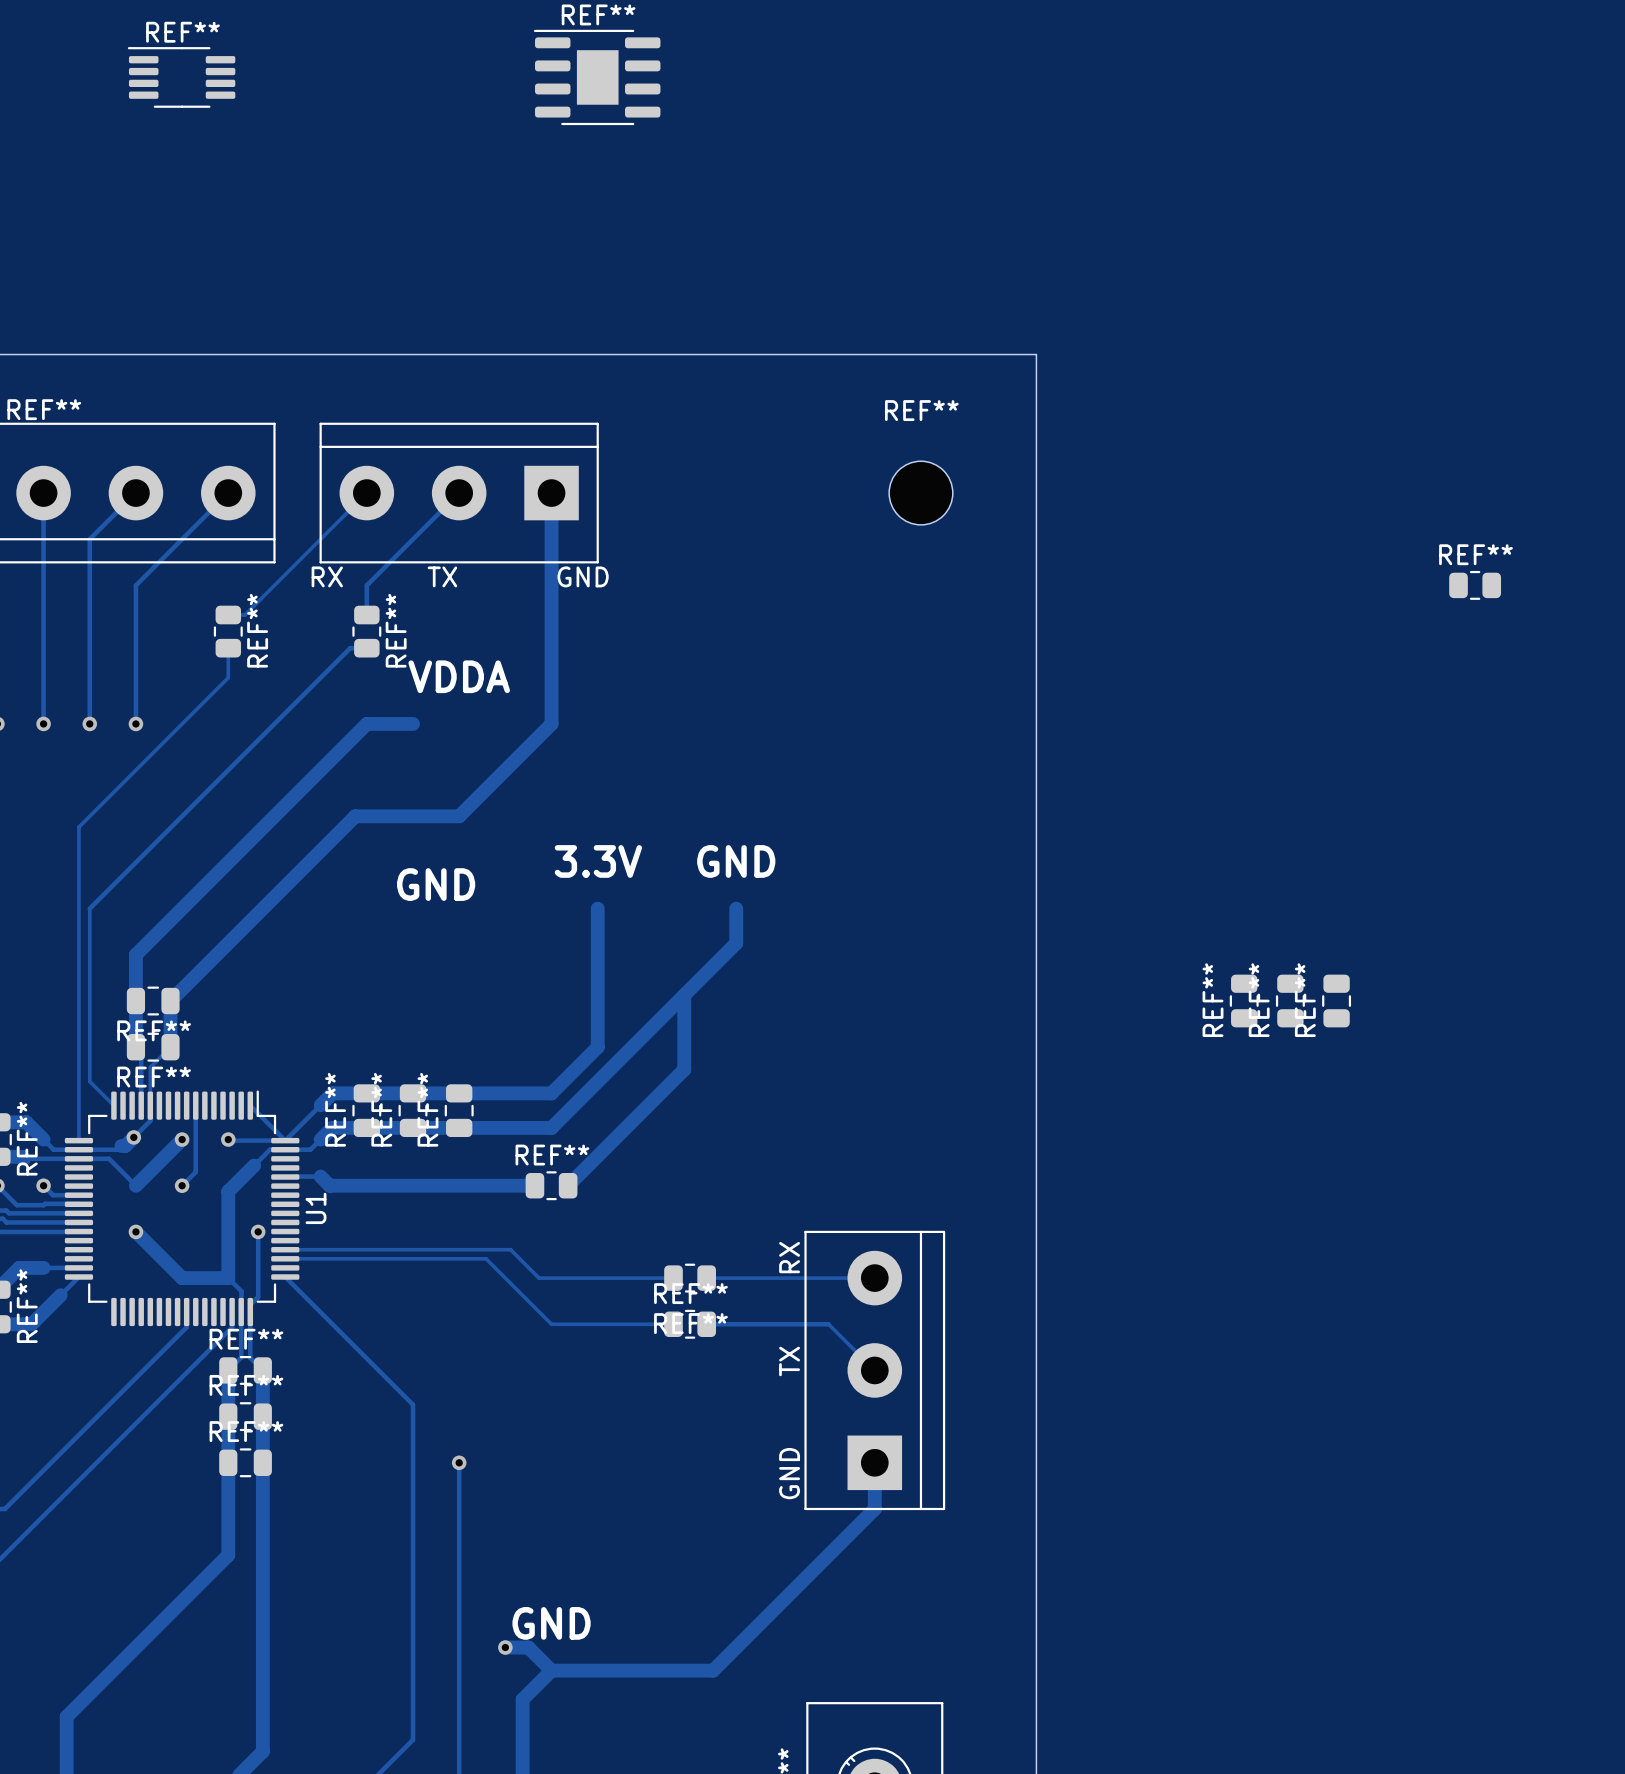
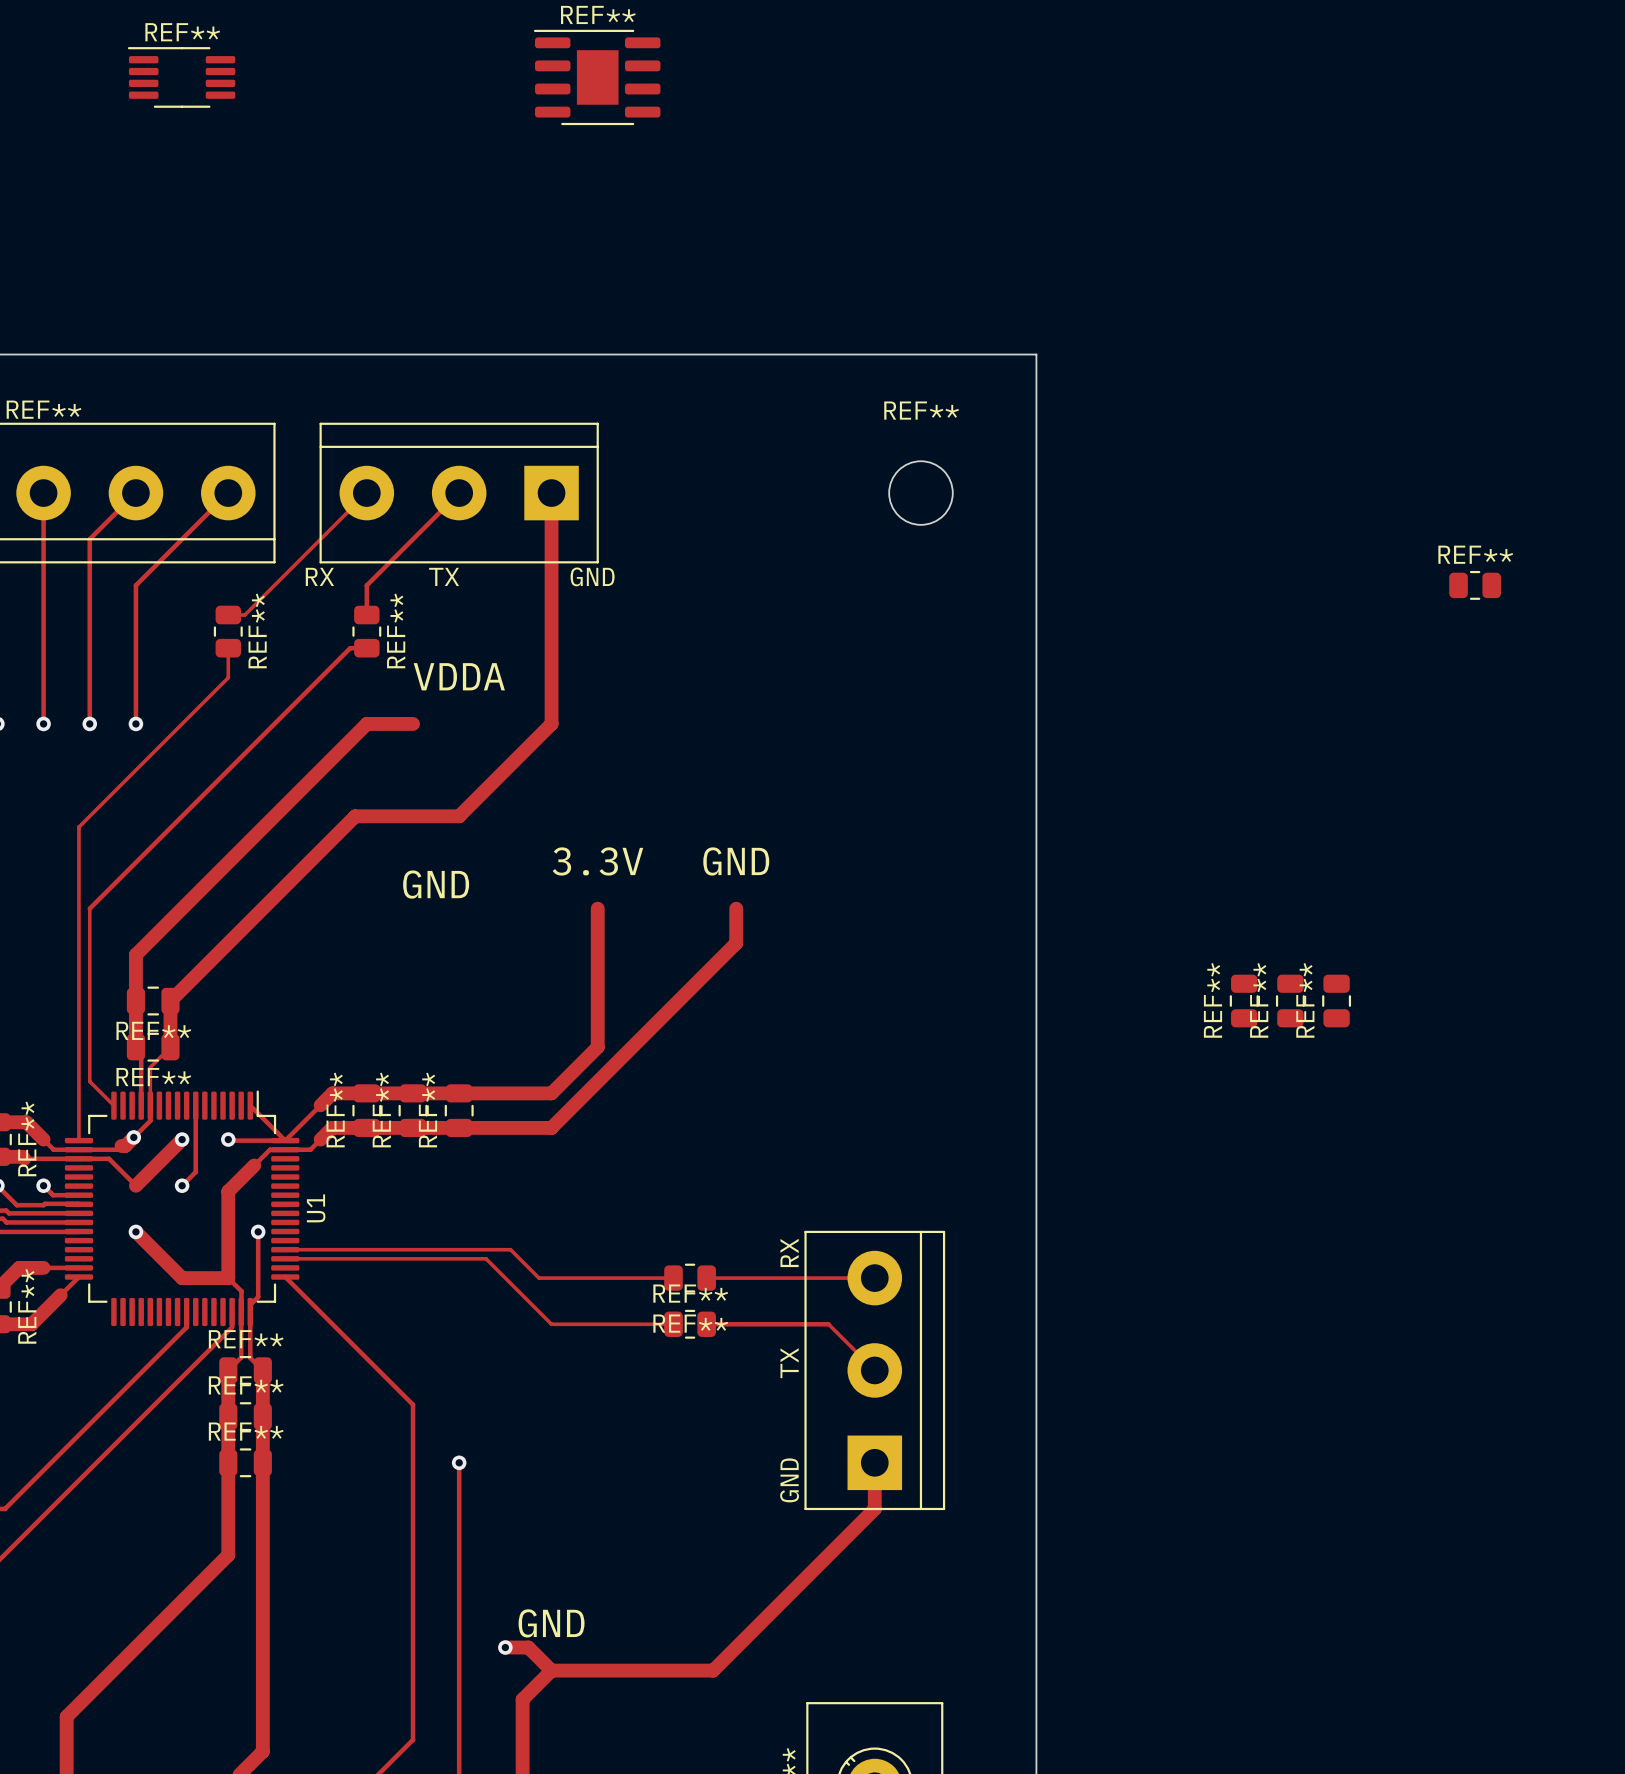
track: (684, 995) (684, 1069) (568, 1185) -> none
track: (293, 1176) (320, 1176) (329, 1185) (534, 1185) -> none
REF**: (551, 1185) -> none

